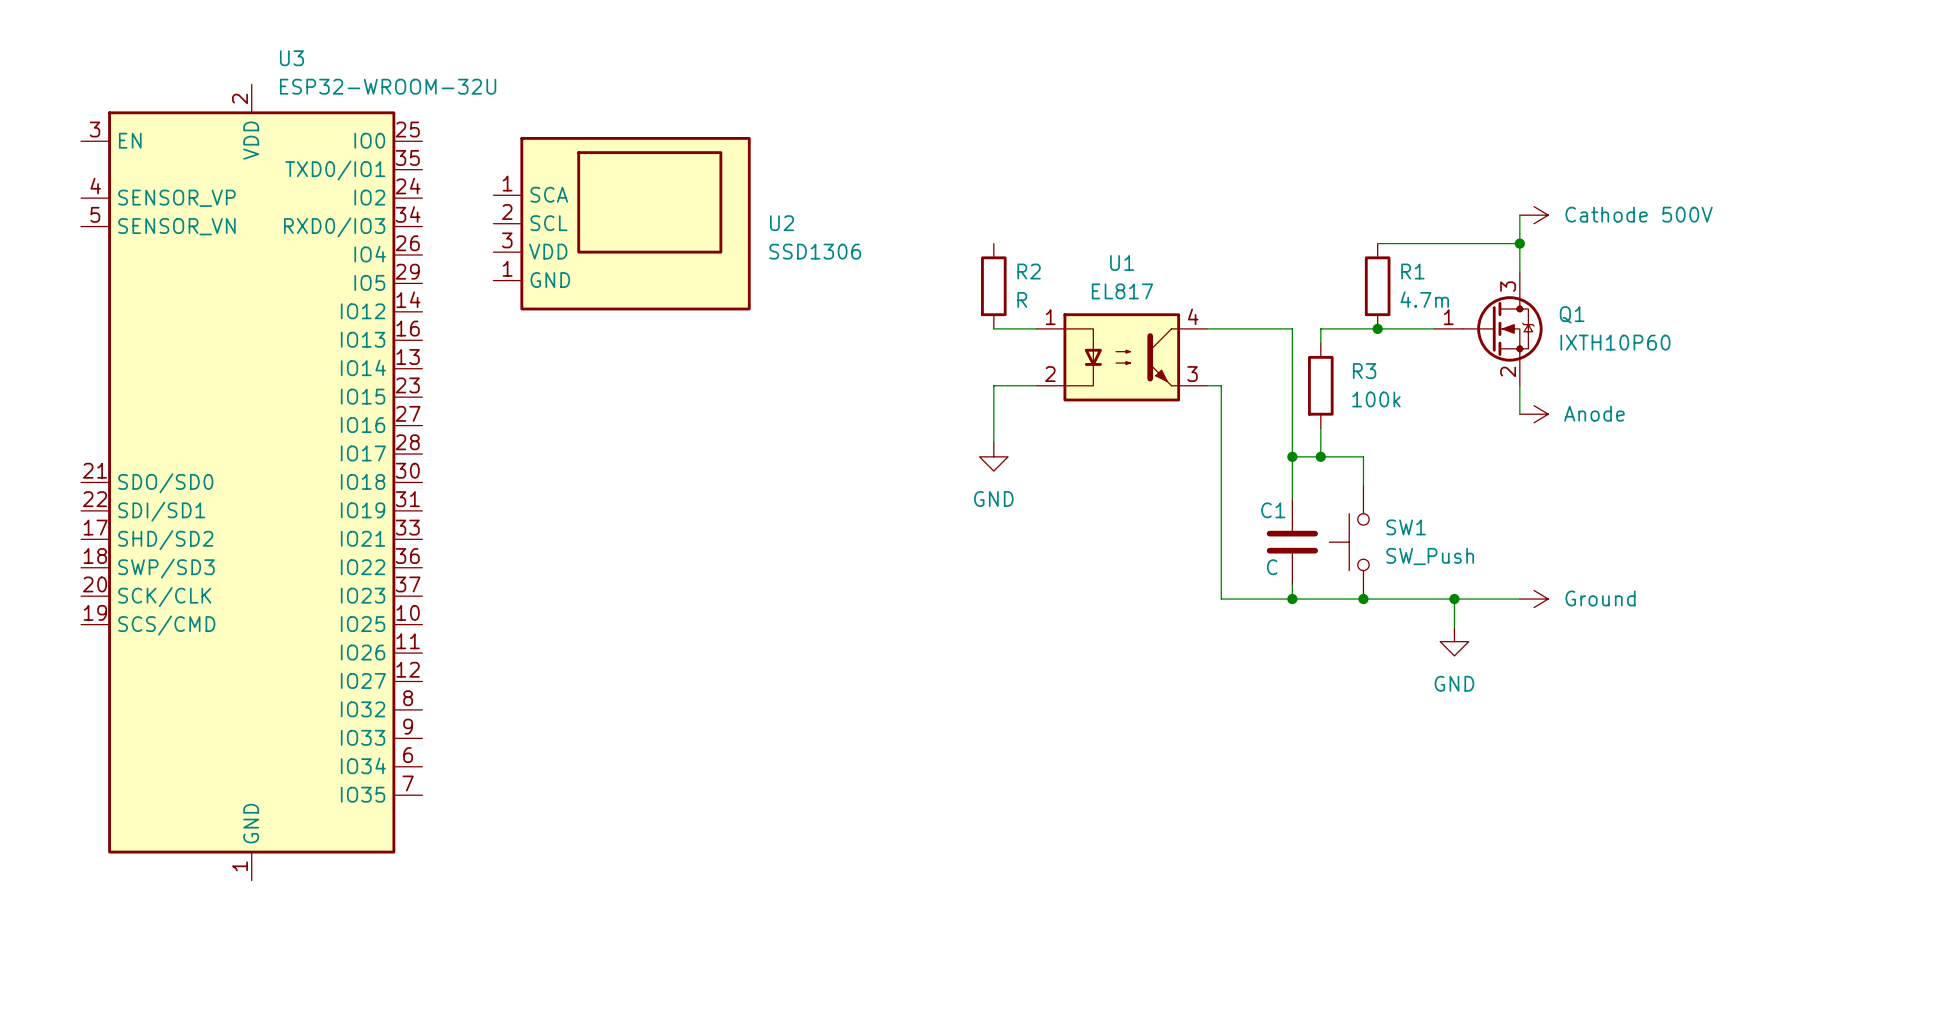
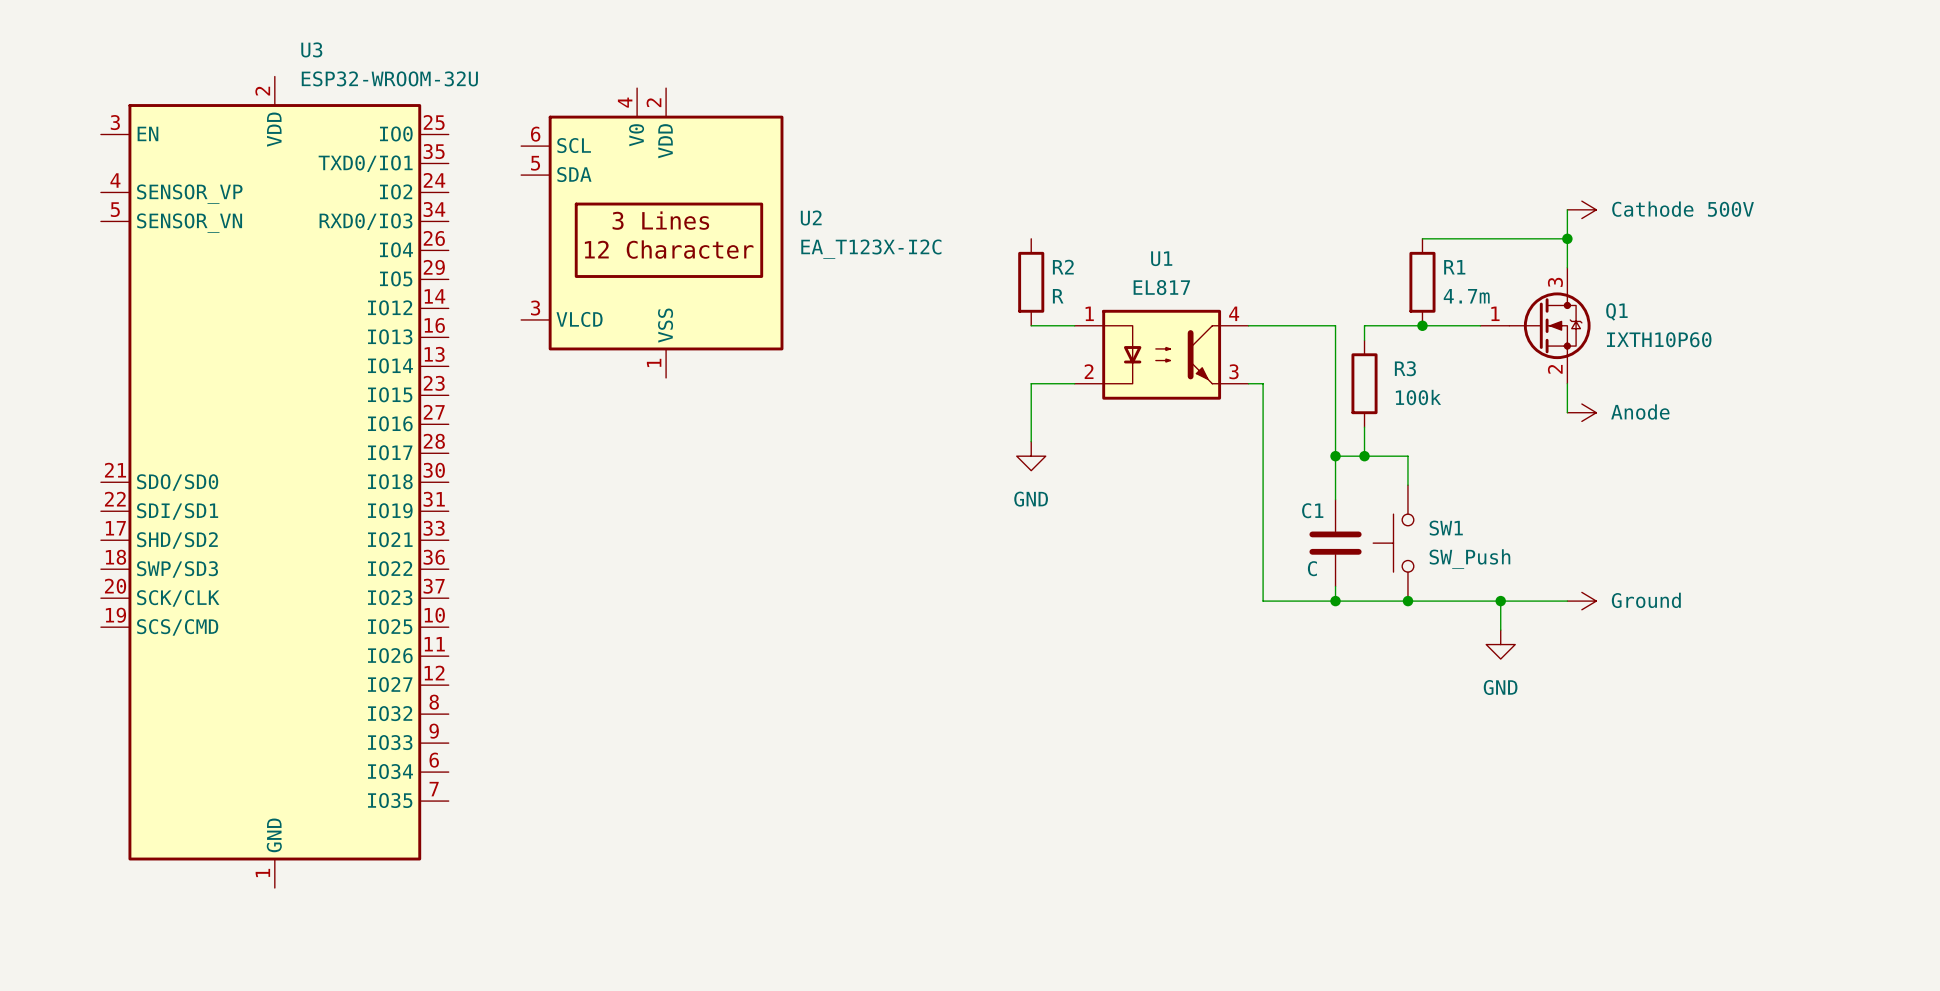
U2 symbol: [493, 136, 751, 311] -> [521, 88, 784, 378]
U2 value: SSD1306 (815, 251) -> EA_T123X-I2C (871, 249)

